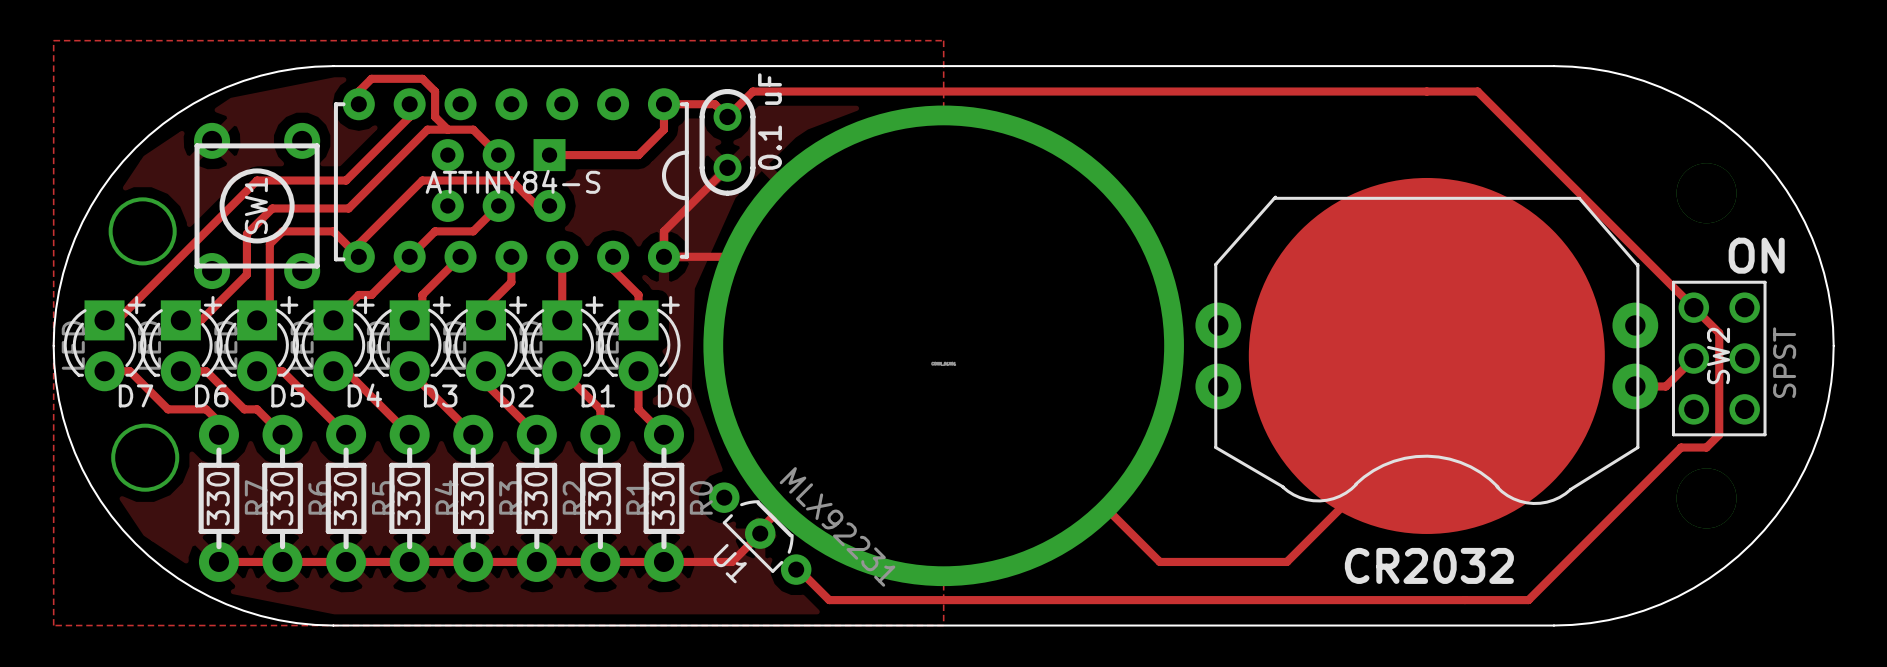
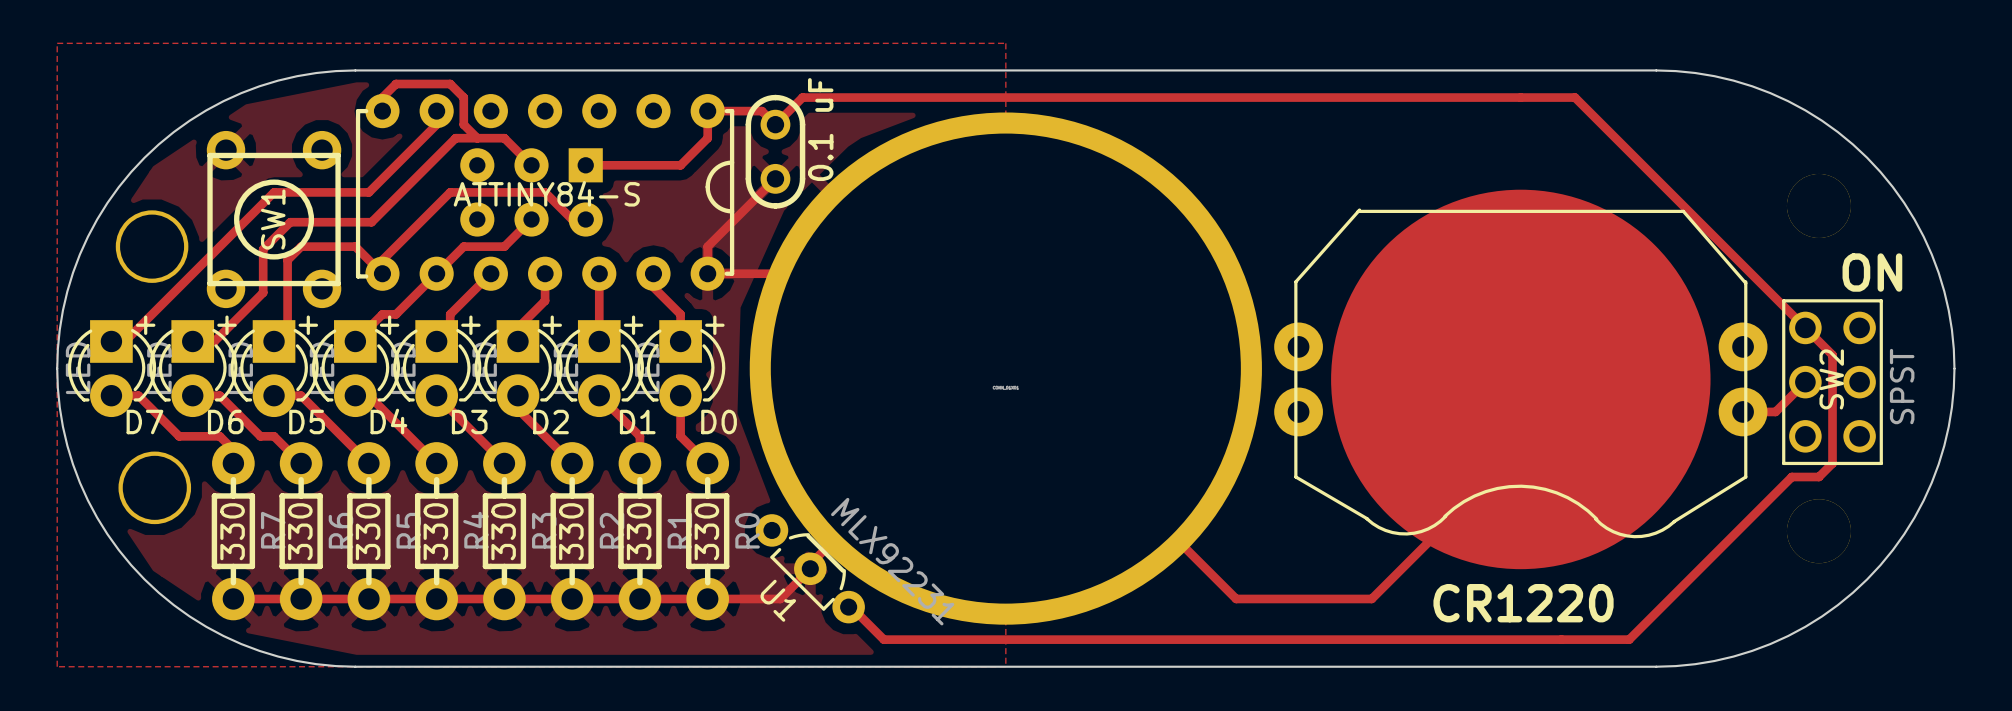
text: CR2032 (1429, 565) -> CR1220 (1523, 603)

